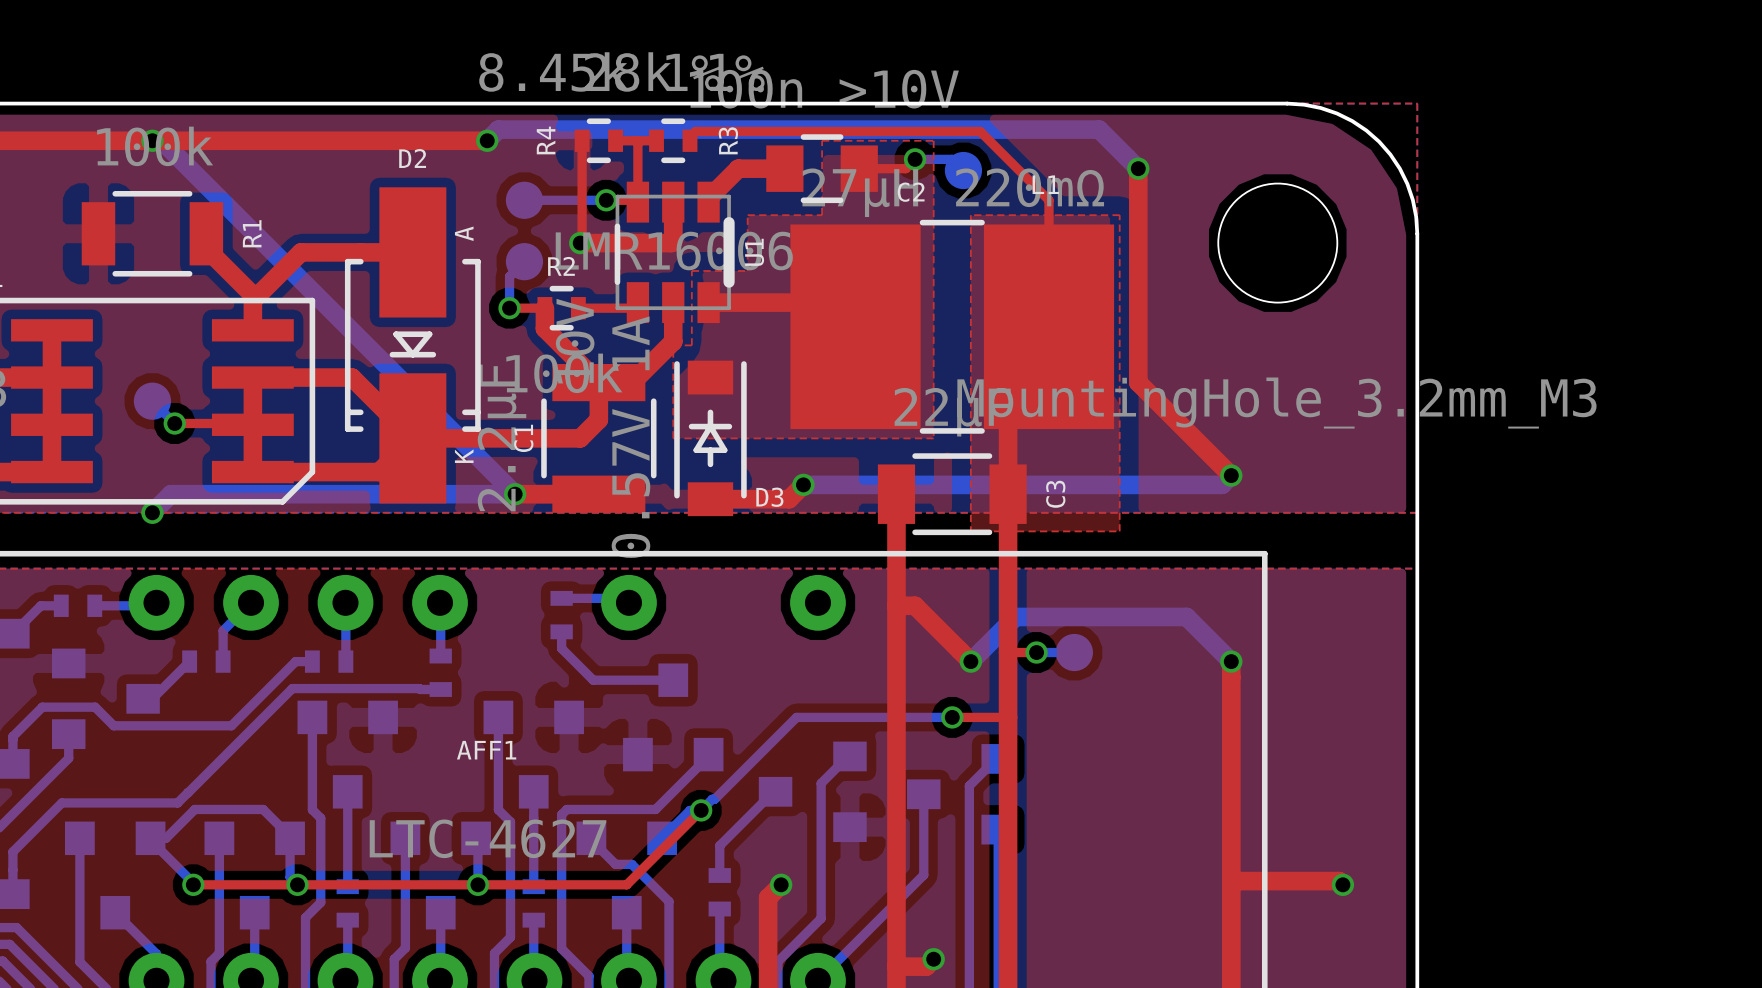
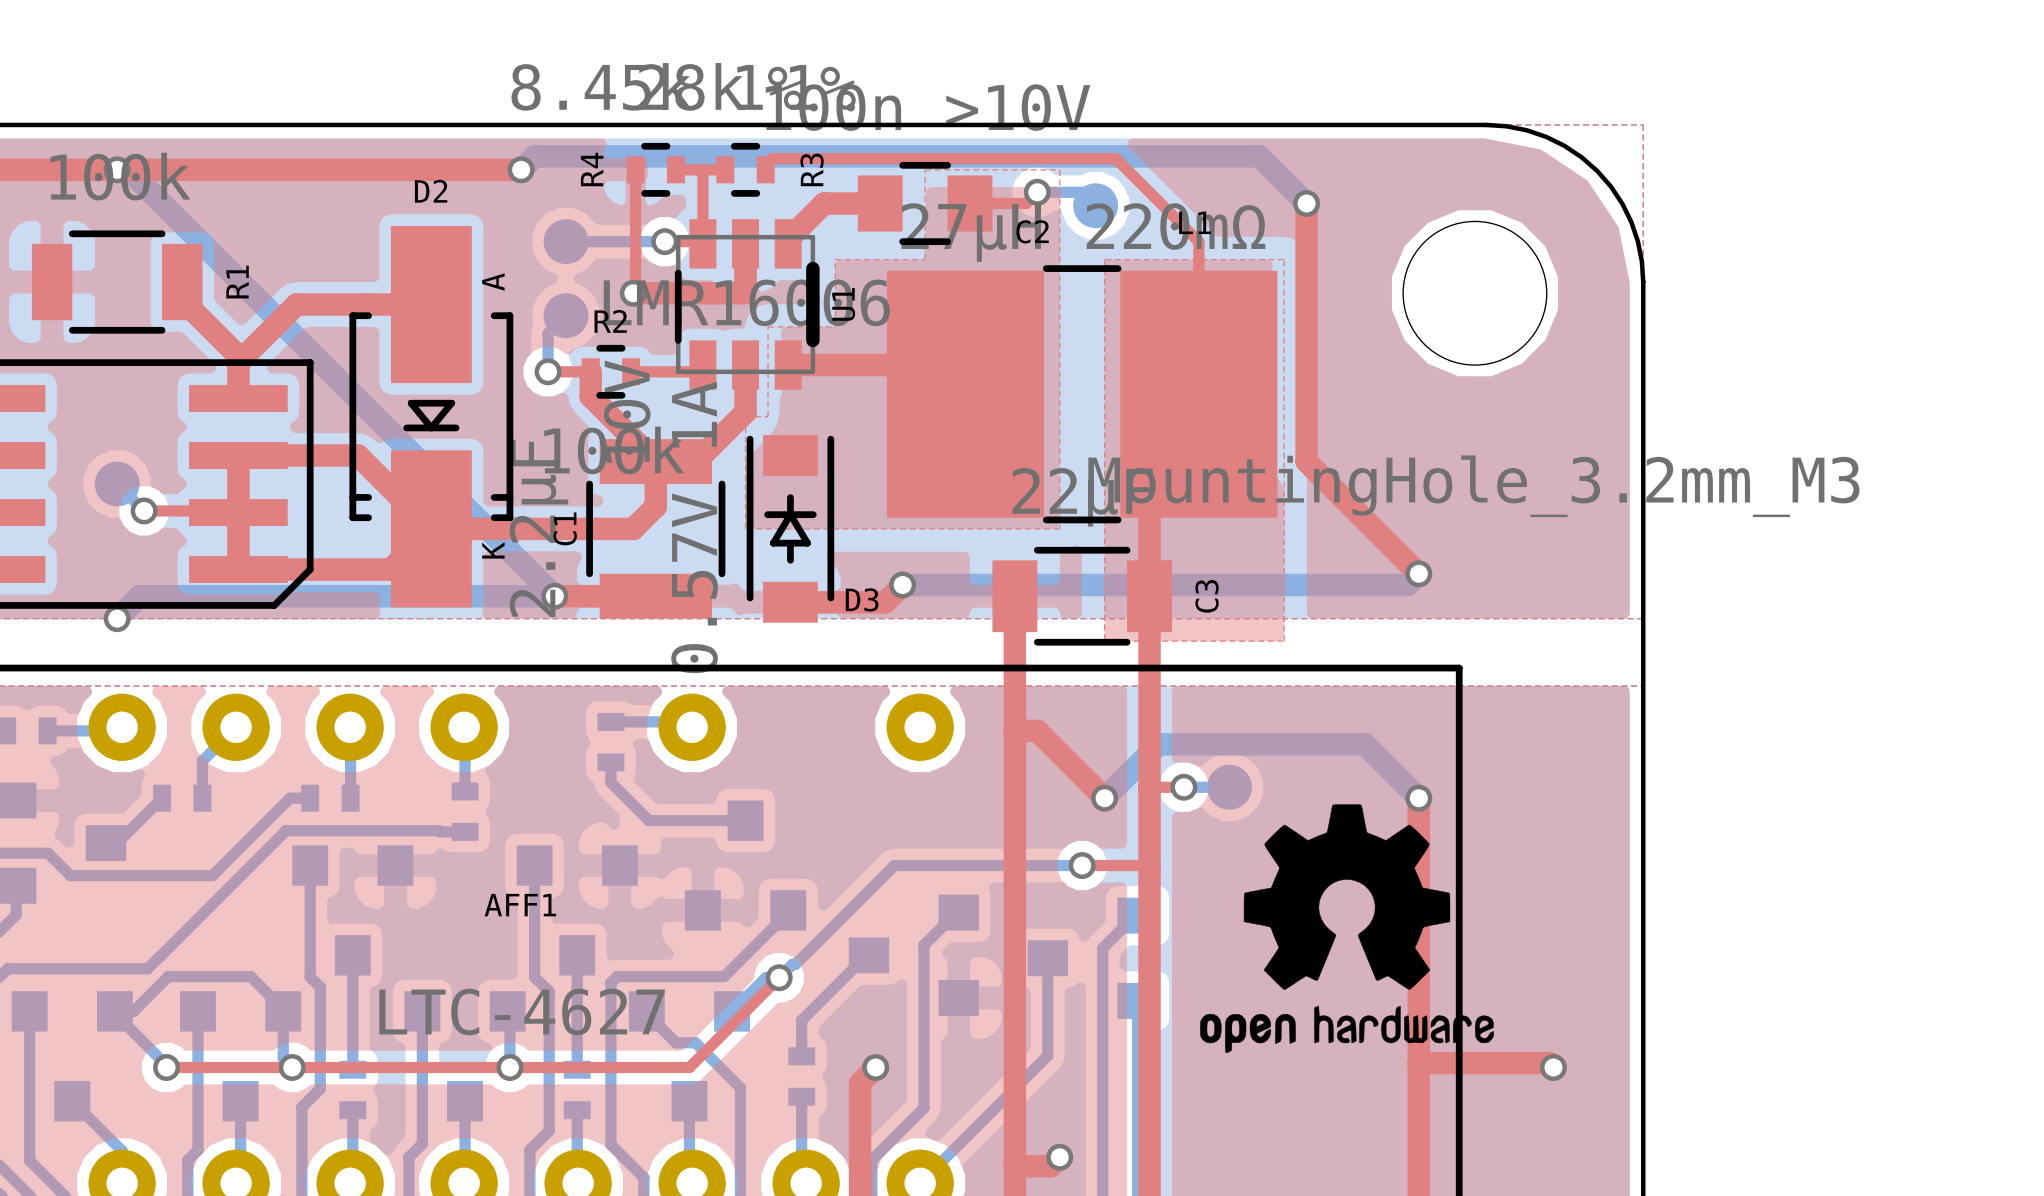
drawing: none -> [1200, 804, 1494, 1053]

